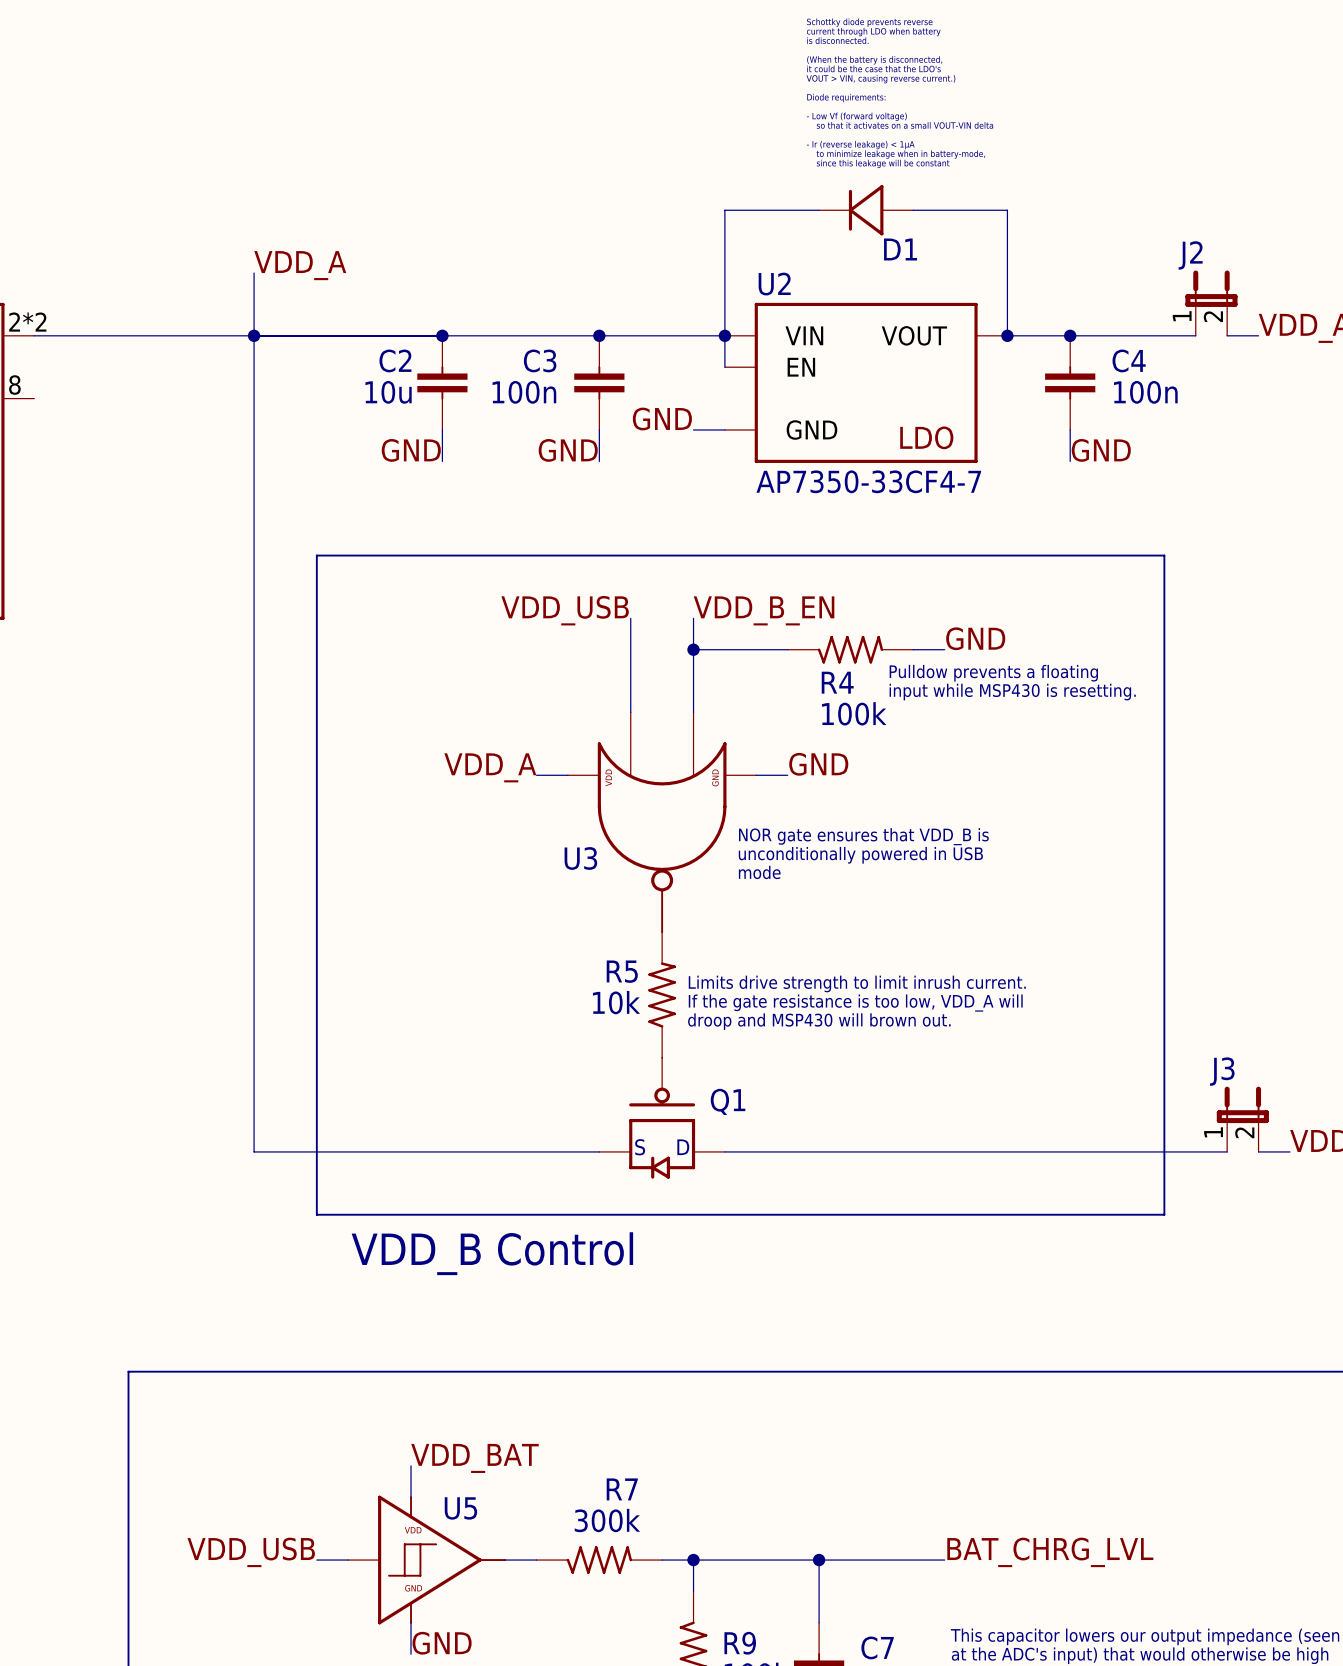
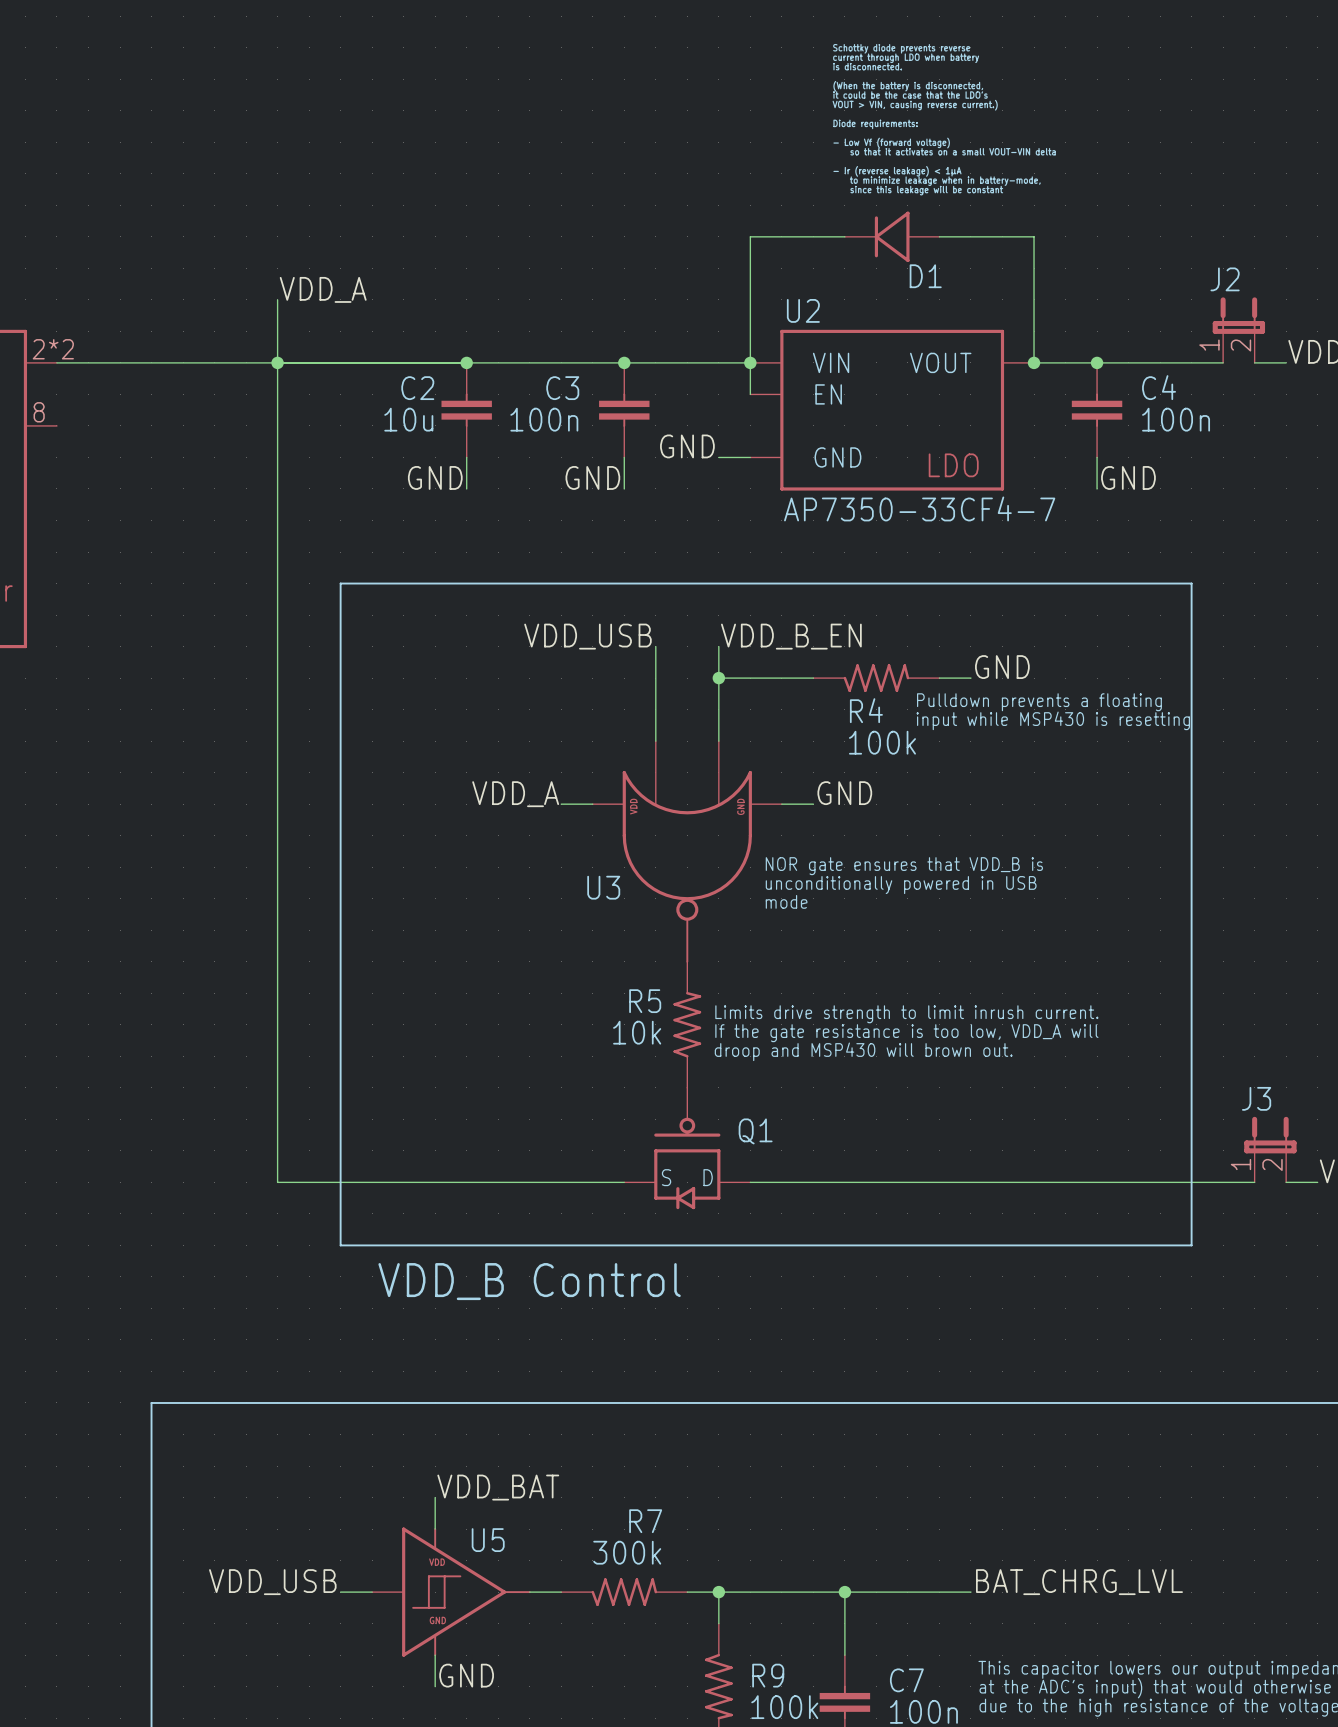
text: Pulldow prevents a floating (993, 673) -> Pulldown prevents a floating (1039, 702)
text: input while MSP430 is resetting. (1012, 692) -> input while MSP430 is resetting (1053, 720)

